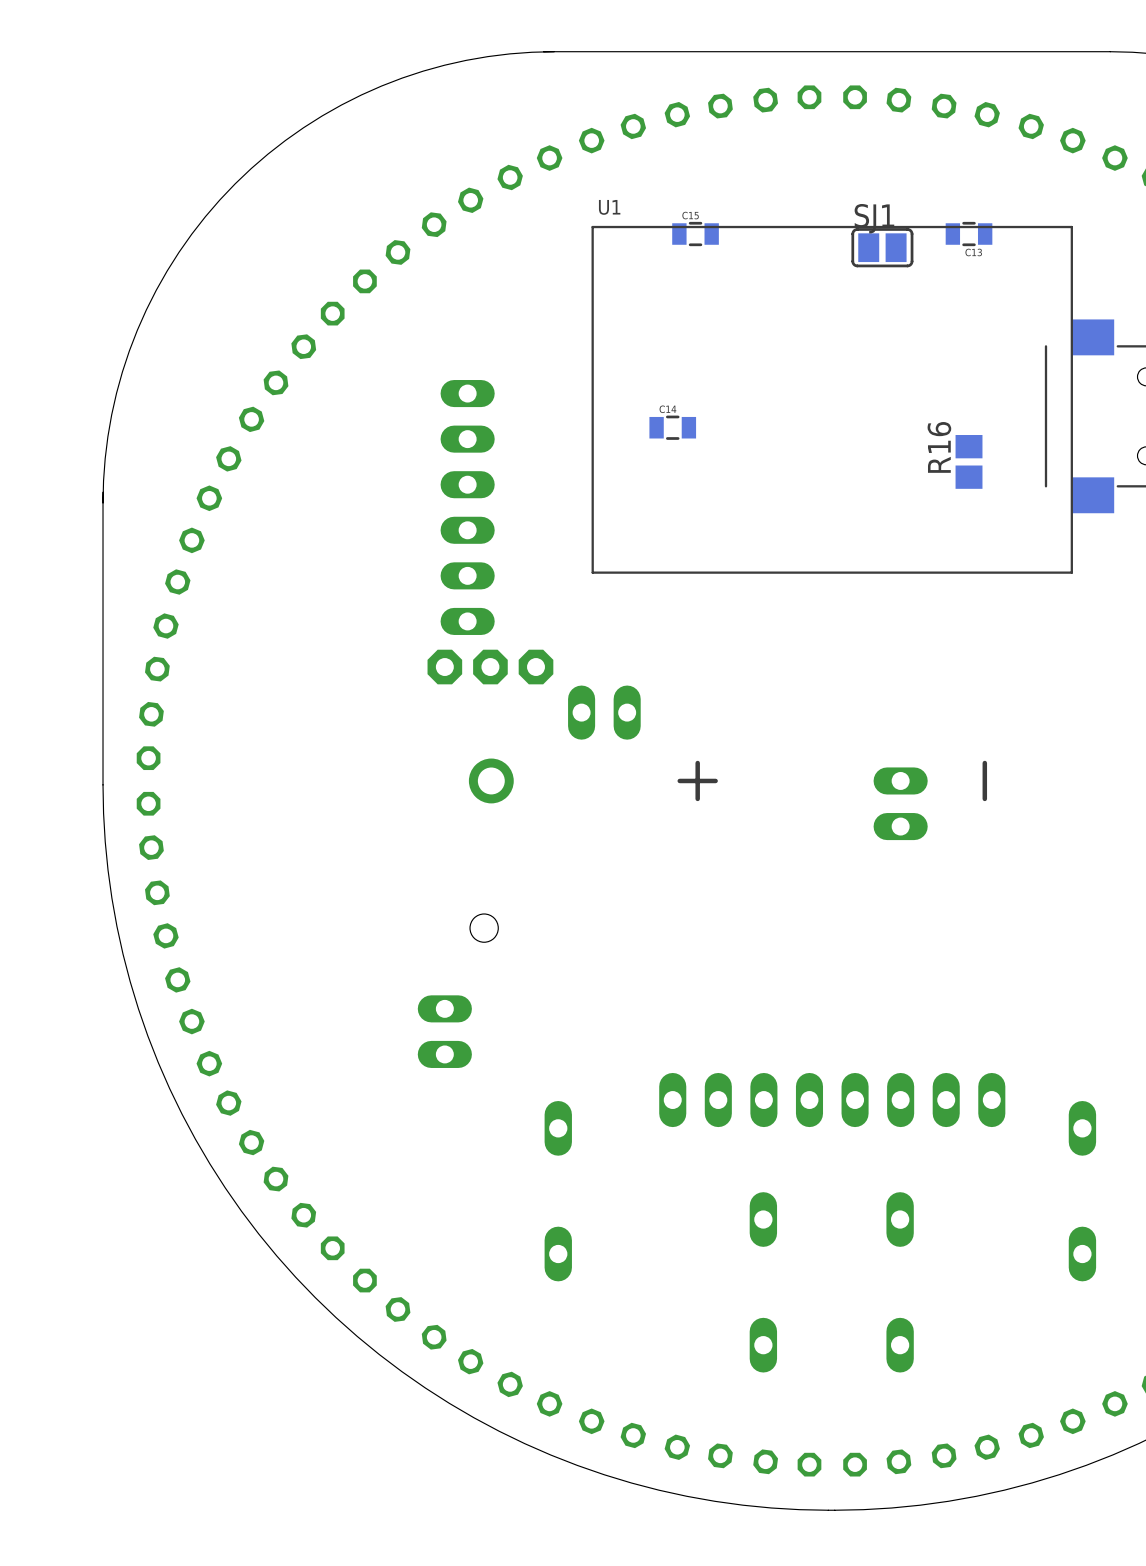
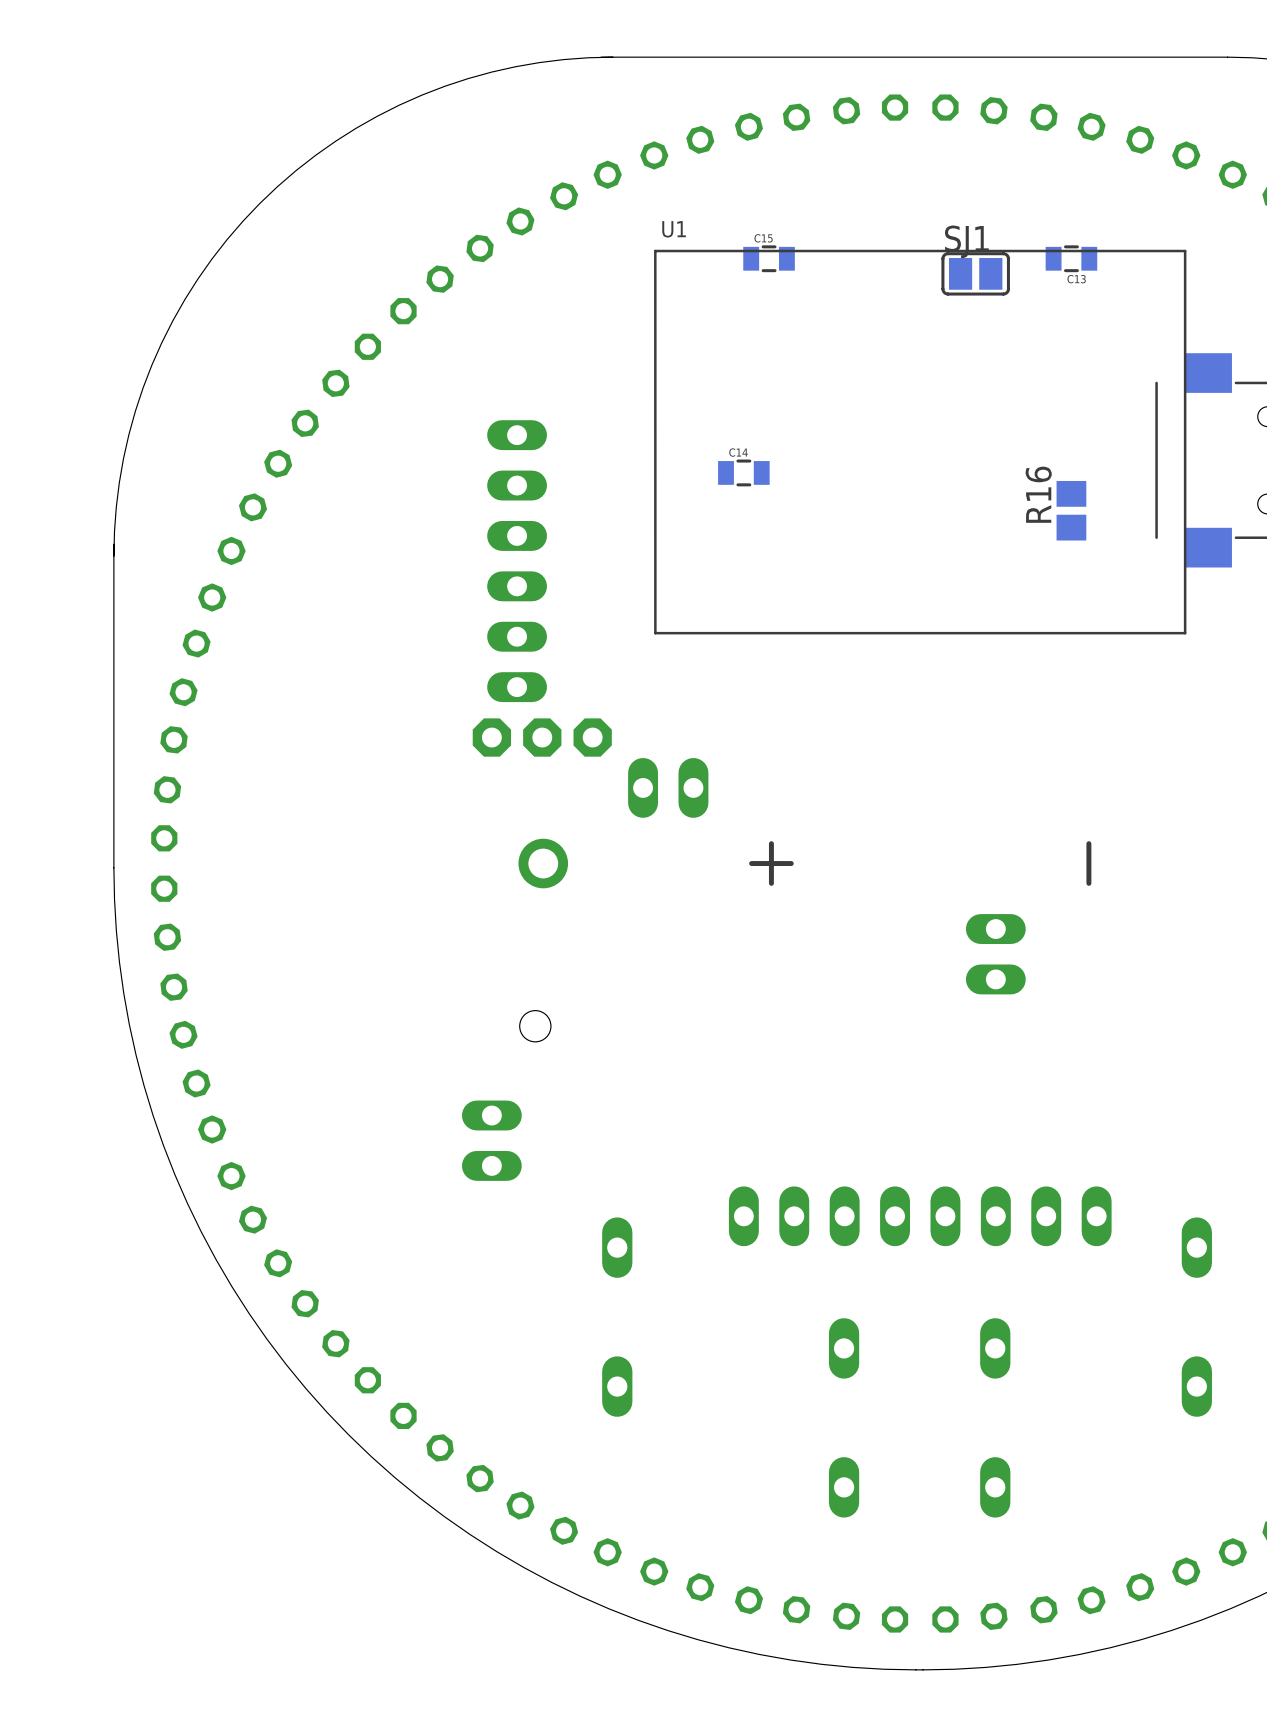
part position: (900, 803) -> (995, 954)

